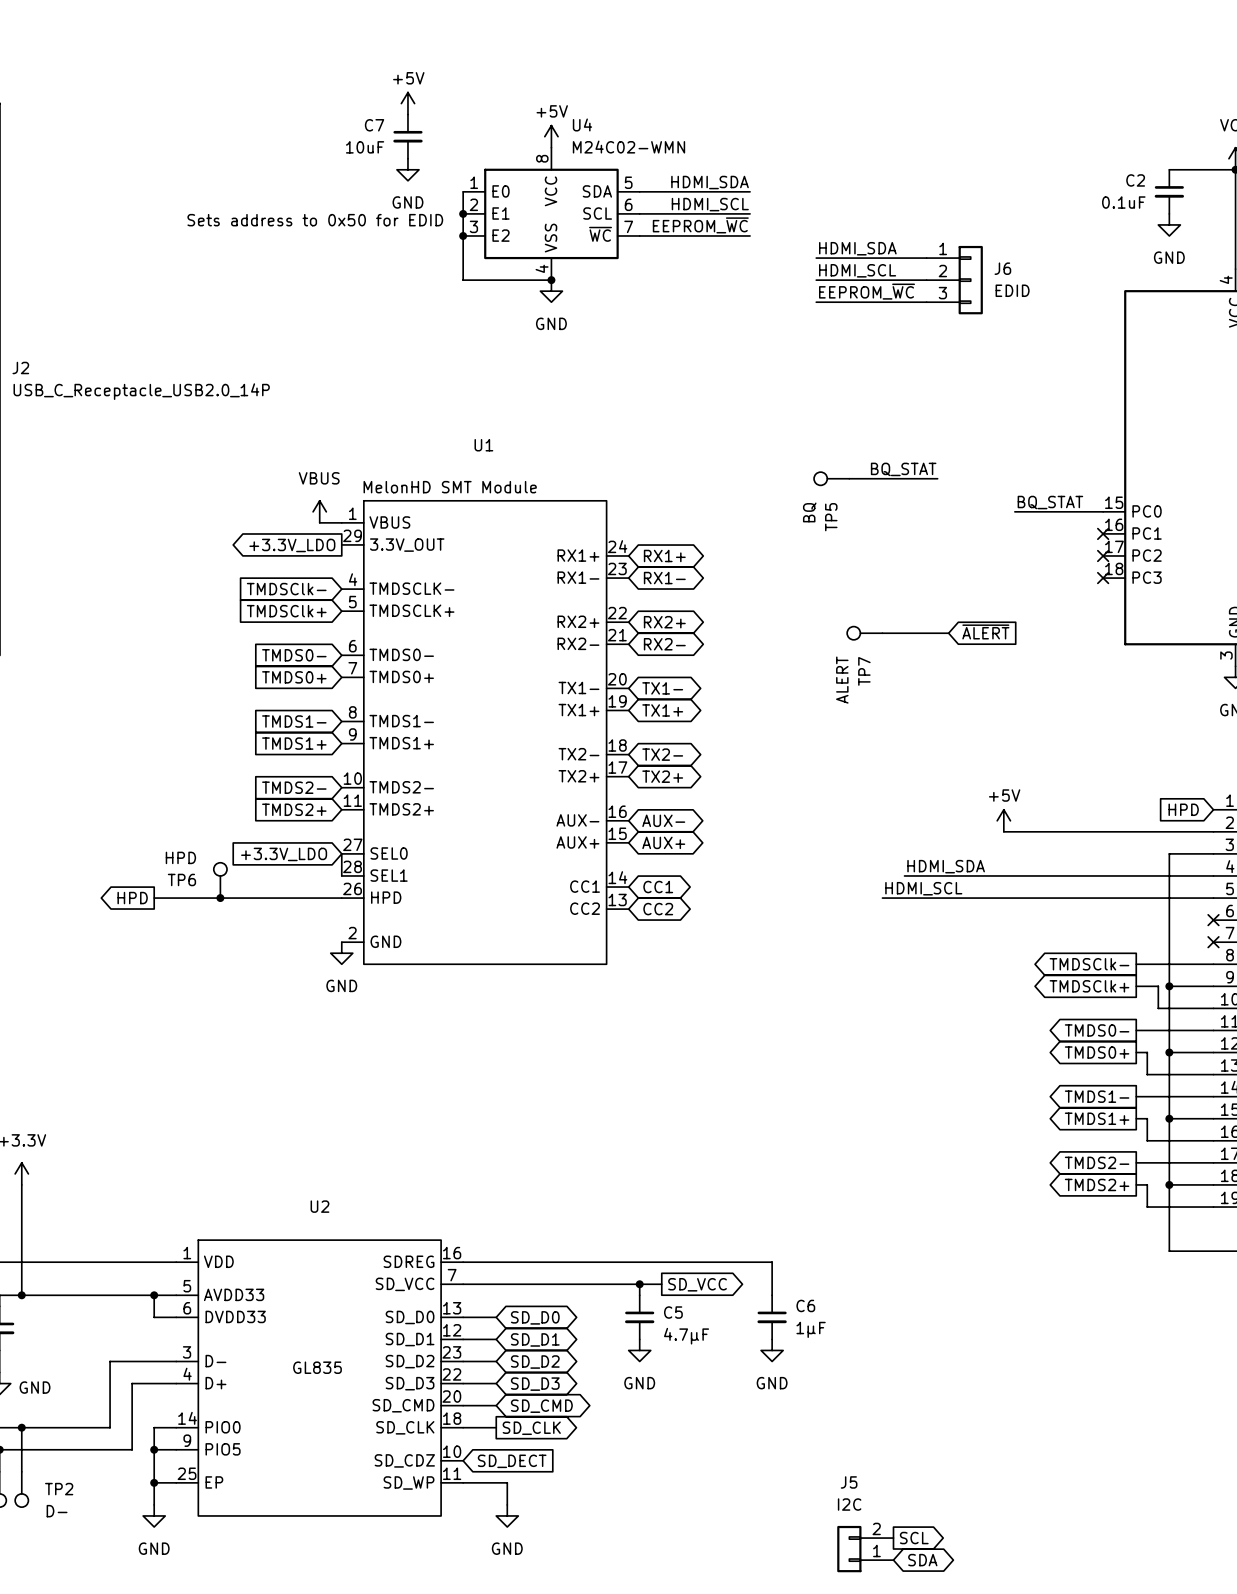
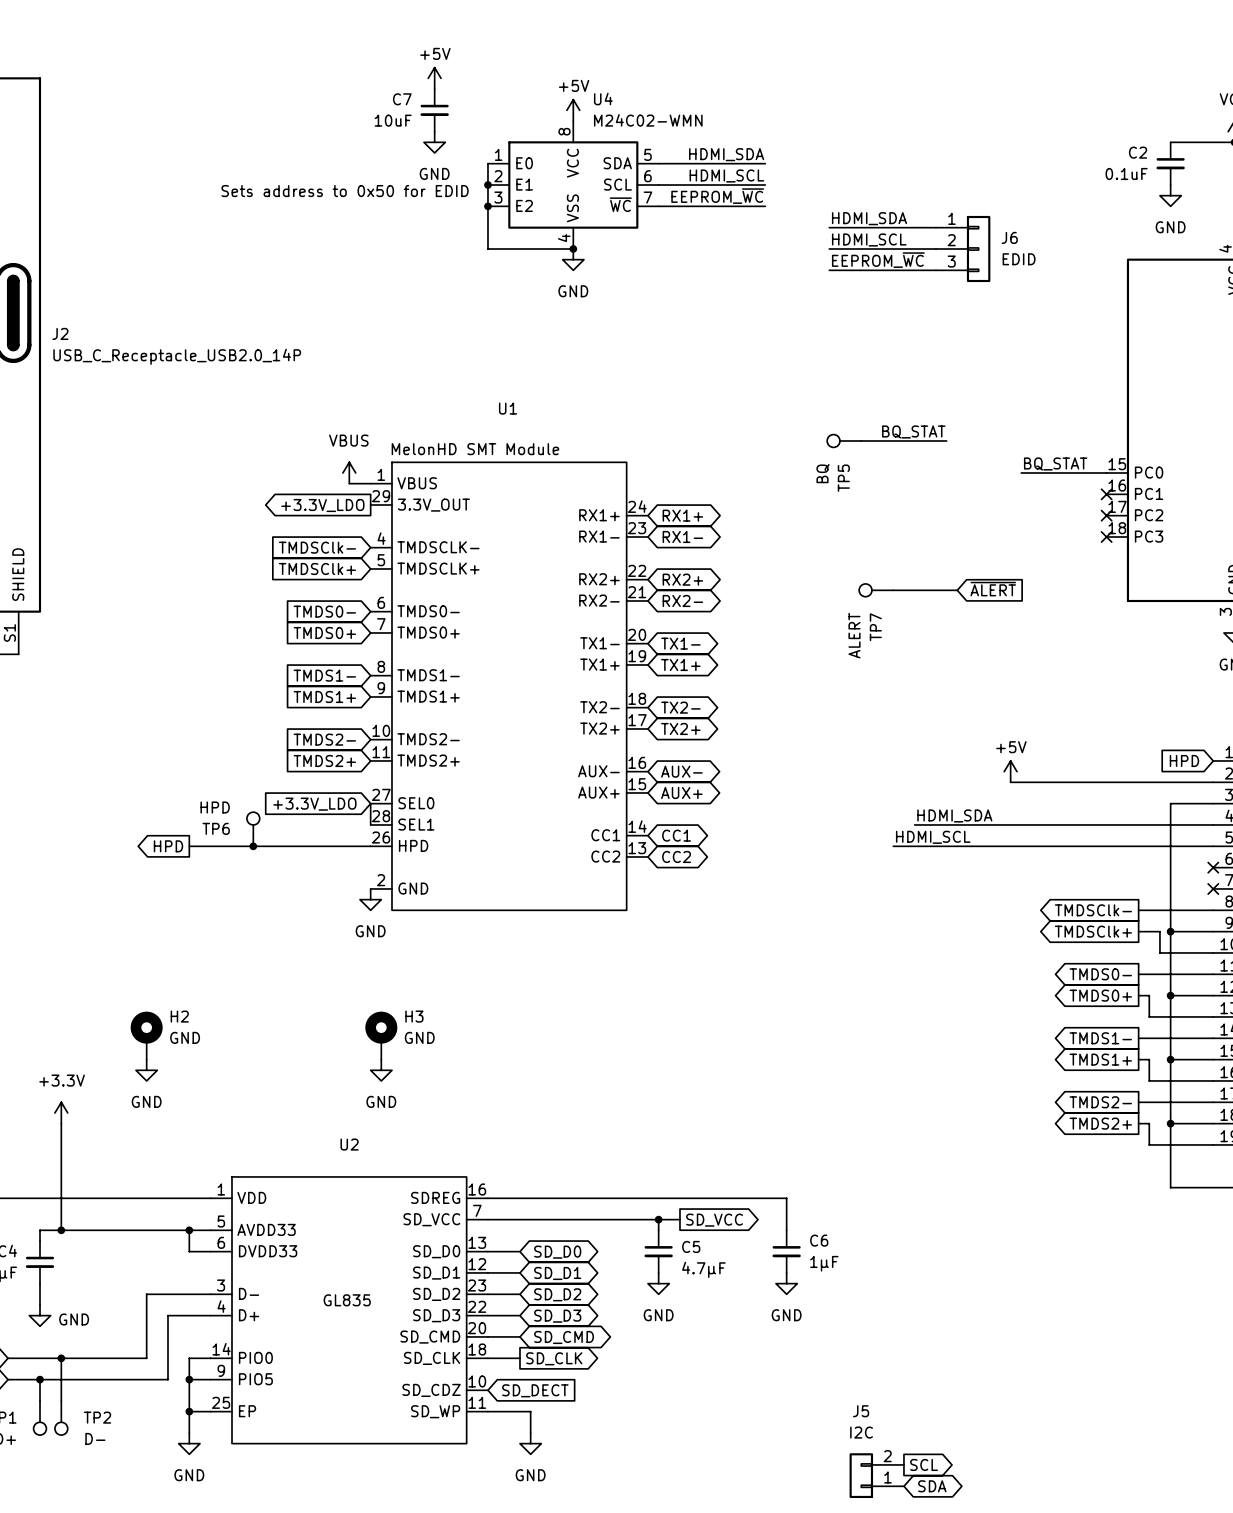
H2: none -> GND (146, 1035)
H3: none -> GND (381, 1035)
power symbol: none -> GND (146, 1070)
power symbol: none -> GND (381, 1070)

